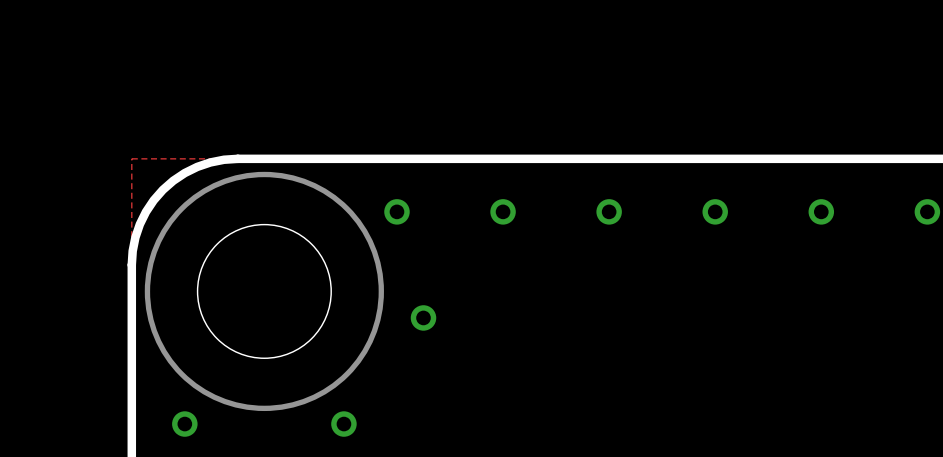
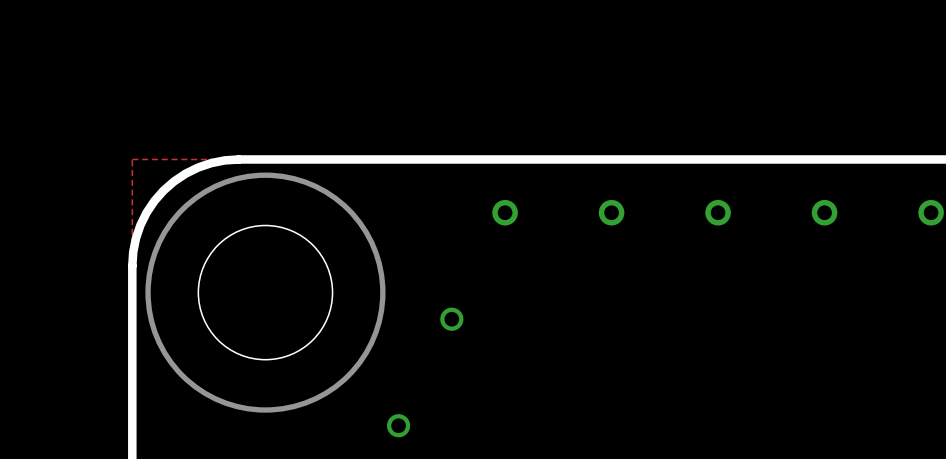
via: (396, 211) -> none
via: (423, 317) -> none
via: none -> (451, 319)
via: (184, 424) -> none
via: (343, 424) -> none
via: none -> (398, 425)

